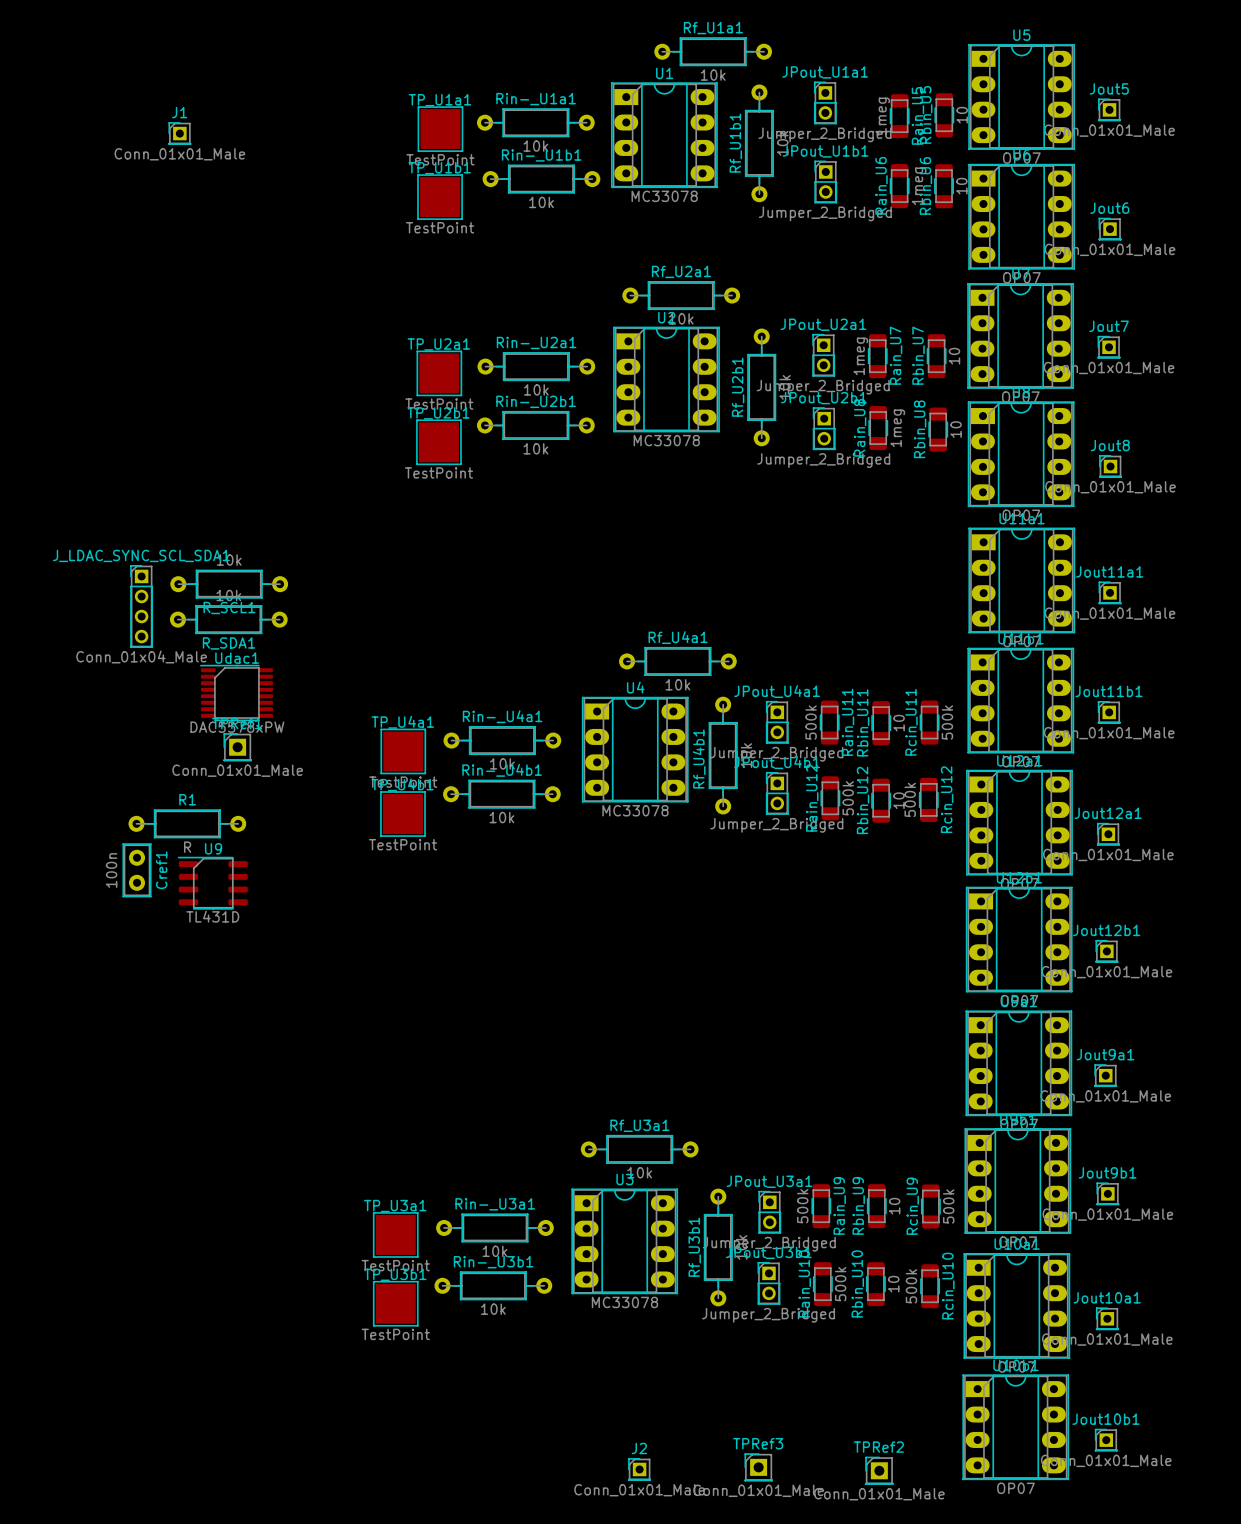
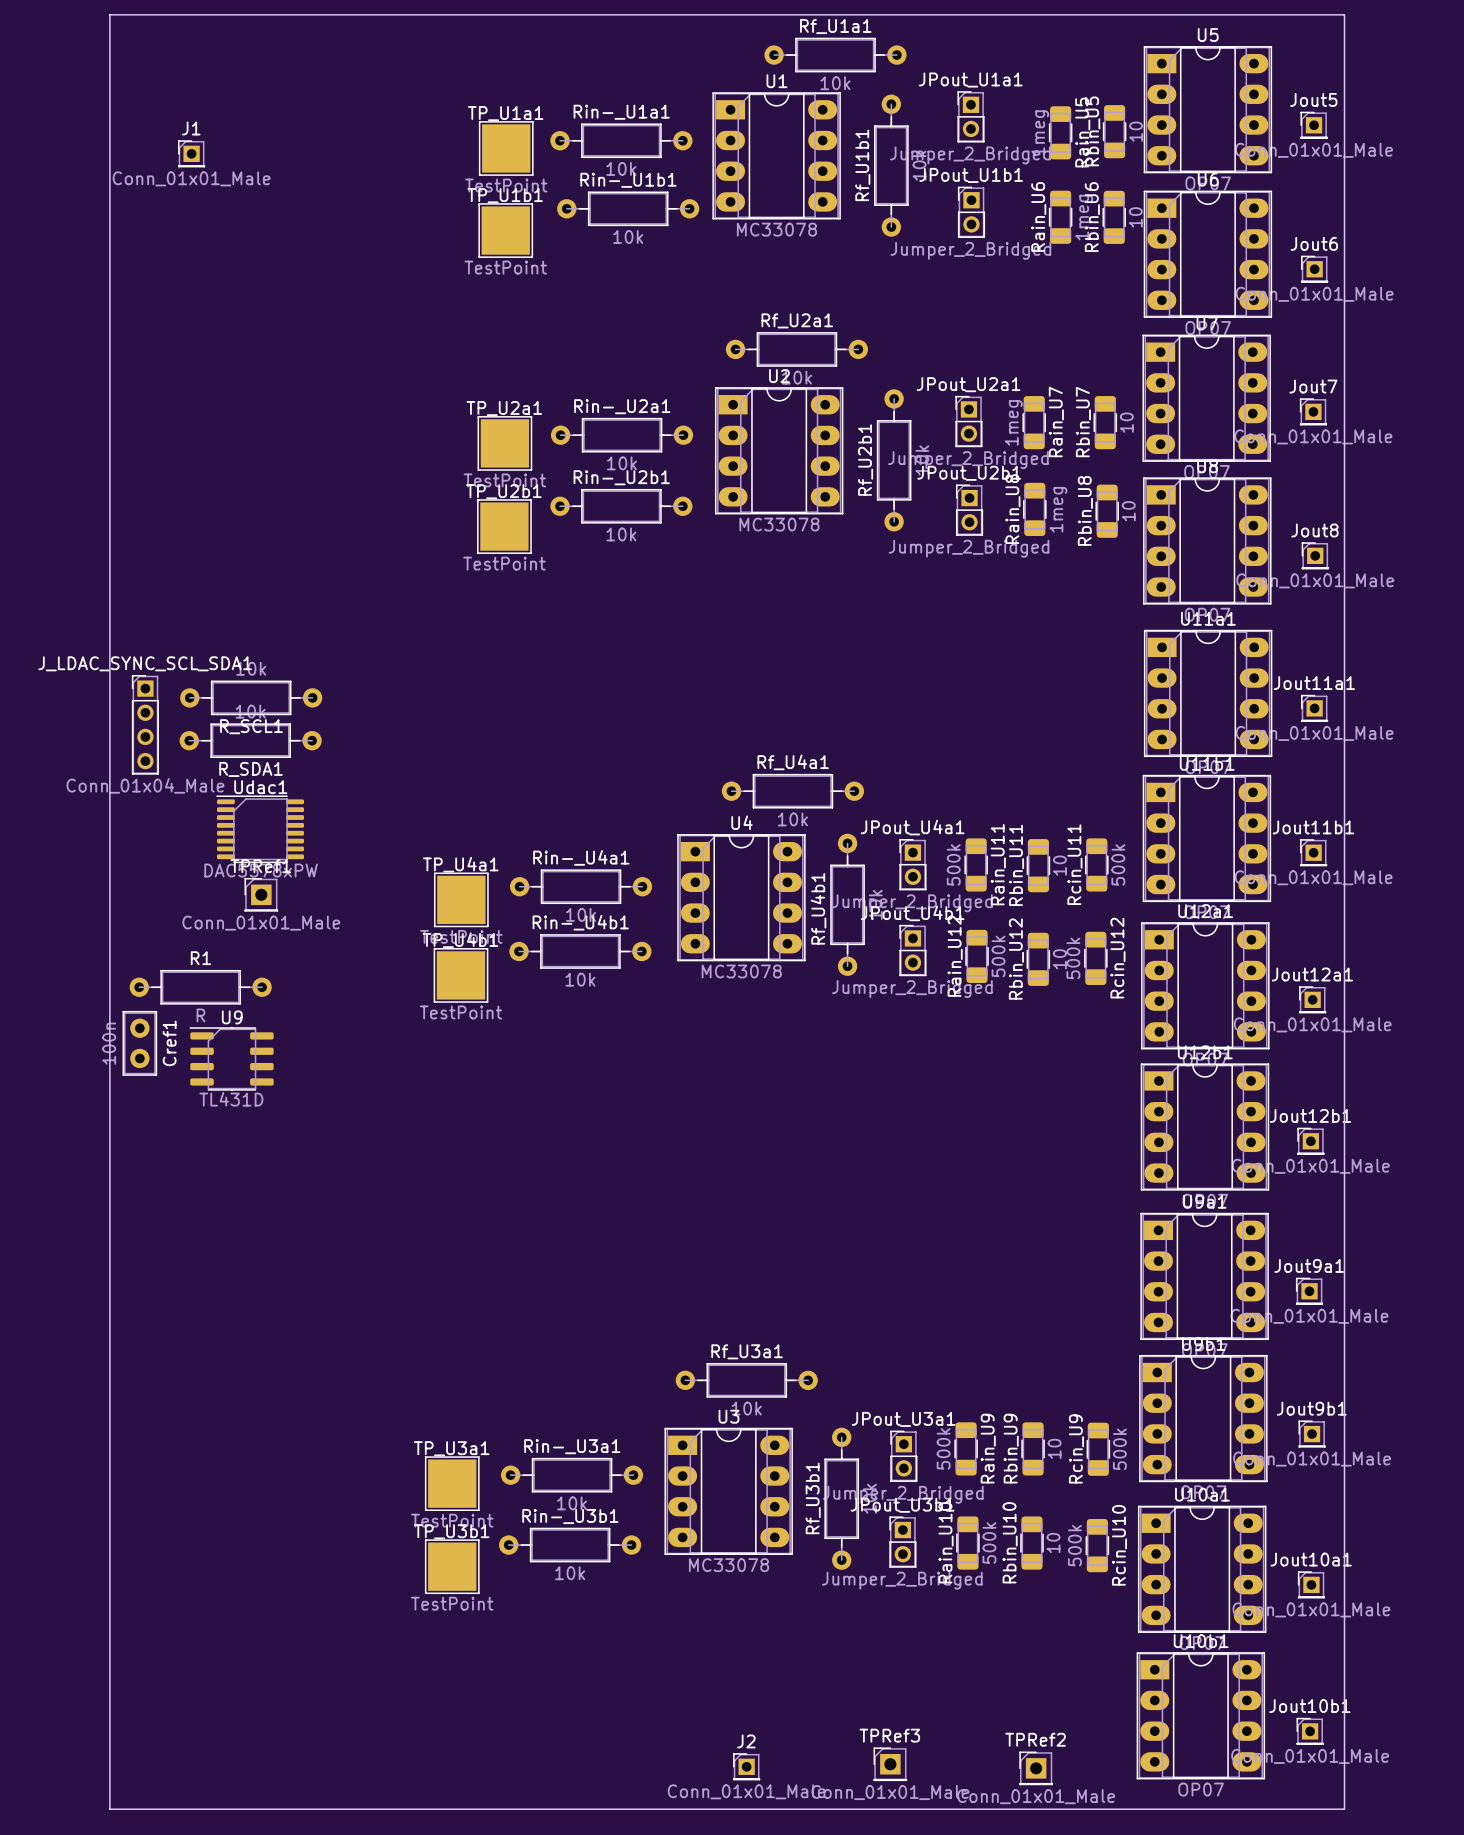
board edge: none -> (109, 14) (1344, 14) (1344, 1809) (109, 1809) (109, 14)

